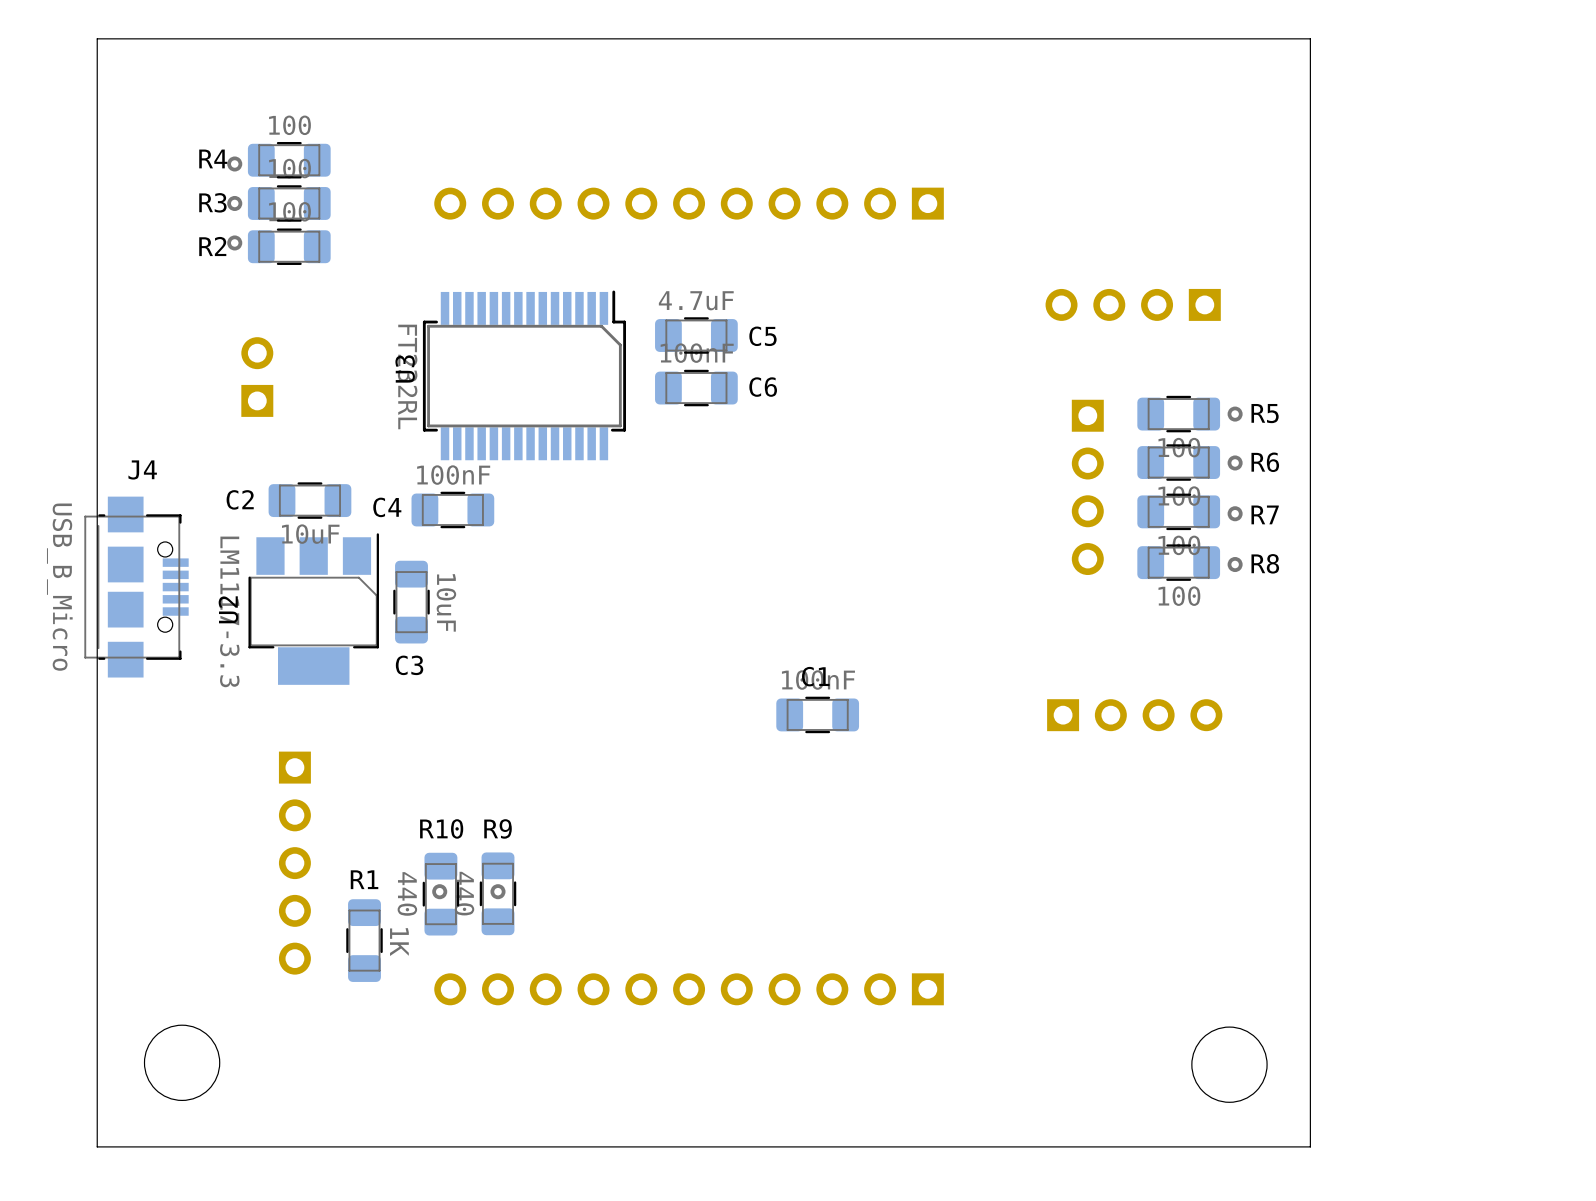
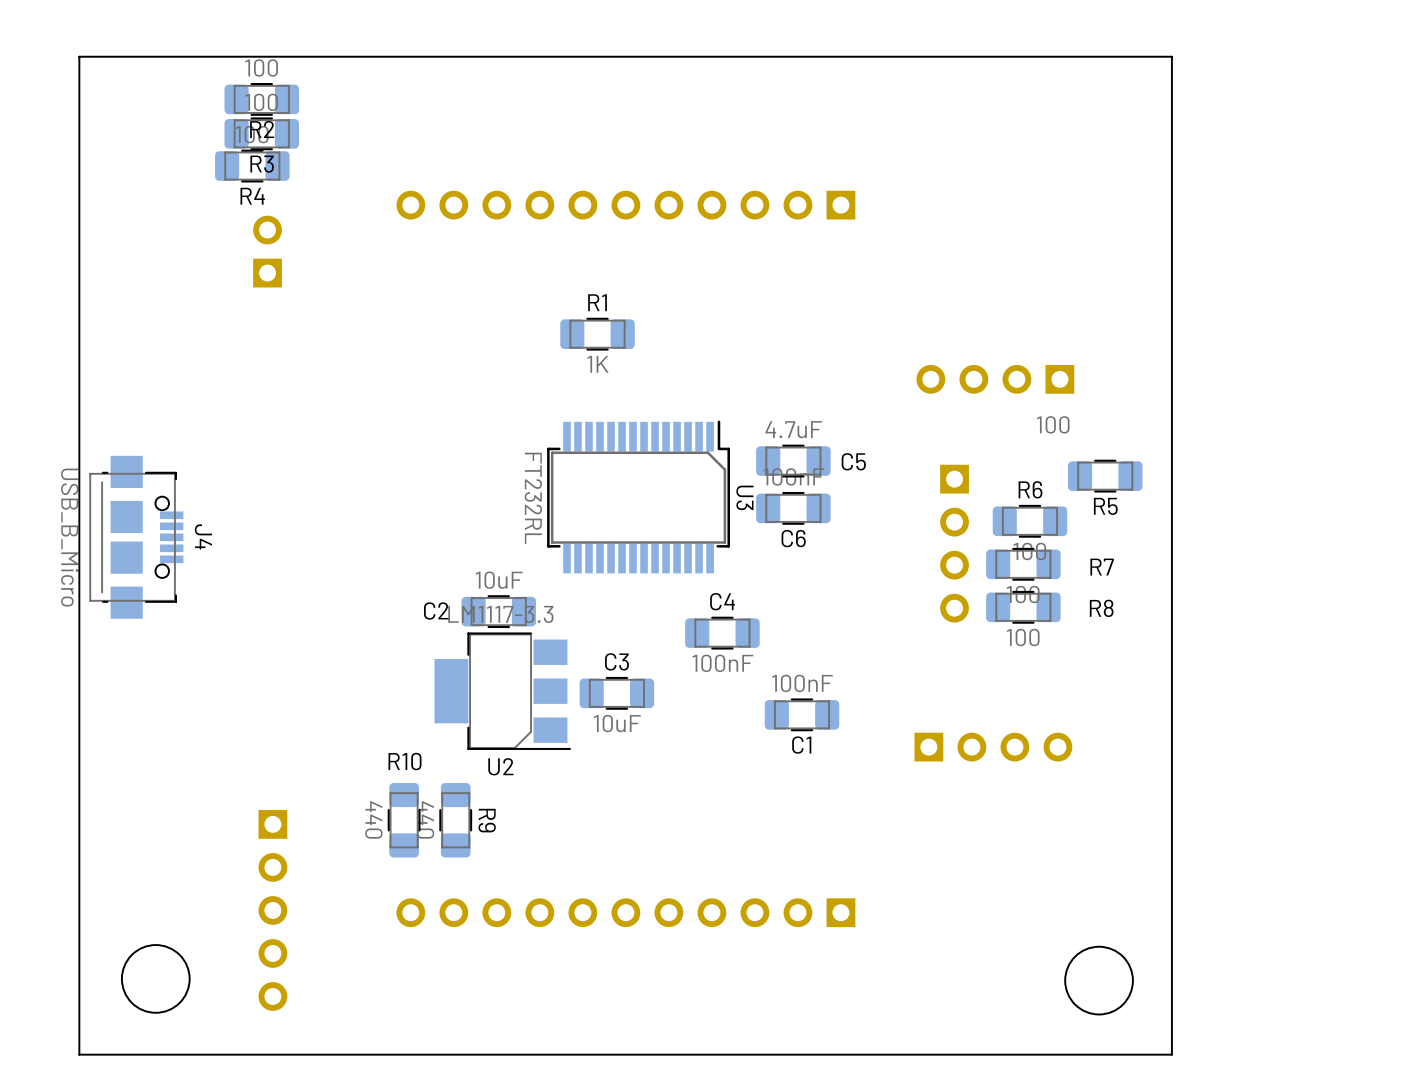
R4 name position: R4 (213, 158) -> R4 (252, 196)
via: (234, 163) -> none
R3 name position: R3 (212, 202) -> R3 (262, 164)
via: (234, 203) -> none
R3 position: (289, 203) -> (261, 133)
part position: (689, 203) -> (625, 205)
via: (234, 242) -> none
R2 name position: R2 (212, 246) -> R2 (262, 129)
R2 position: (289, 246) -> (261, 99)
part: (1133, 304) -> none
C5 position: (696, 335) -> (793, 461)
U3 name rotation: 0° (405, 368) -> 180° (744, 497)
U3 name position: U3 (405, 368) -> U3 (744, 497)
U3 position: (524, 375) -> (638, 496)
part position: (257, 377) -> (267, 251)
C6 name position: C6 (763, 387) -> C6 (793, 538)
C6 position: (696, 388) -> (793, 508)
part: none -> (995, 379)
R5 name position: R5 (1265, 413) -> R5 (1105, 506)
R5 position: (1178, 414) -> (1105, 476)
via: (1235, 414) -> none
R6 position: (1178, 462) -> (1029, 521)
via: (1235, 462) -> none
R6 name position: R6 (1265, 462) -> R6 (1030, 489)
J4 name rotation: 0° (142, 469) -> 90° clockwise (203, 536)
J4 name position: J4 (142, 469) -> J4 (203, 536)
C4 value position: 100nF (453, 475) -> 100nF (722, 663)
part: (1087, 487) -> none
C2 position: (309, 500) -> (498, 611)
C4 name position: C4 (387, 507) -> C4 (722, 601)
C4 position: (452, 509) -> (722, 633)
R7 position: (1178, 511) -> (1023, 564)
via: (1235, 513) -> none
C2 value position: 10uF (310, 534) -> 10uF (499, 580)
R8 position: (1178, 562) -> (1023, 607)
via: (1235, 564) -> none
part: none -> (954, 543)
J4 position: (136, 587) -> (136, 537)
C3 rotation: 0° (411, 602) -> 90° clockwise (616, 693)
C3 position: (411, 602) -> (616, 693)
U2 name position: U2 (228, 609) -> U2 (500, 766)
U2 rotation: 0° (313, 609) -> 90° clockwise (502, 691)
U2 position: (313, 609) -> (502, 691)
C3 name position: C3 (409, 665) -> C3 (616, 661)
C1 name position: C1 (815, 676) -> C1 (801, 745)
C1 position: (817, 714) -> (801, 714)
part: (1134, 715) -> none
part: none -> (993, 747)
R9 name rotation: 0° (498, 828) -> 90° clockwise (487, 820)
R9 name position: R9 (498, 828) -> R9 (487, 820)
part position: (294, 863) -> (272, 910)
via: (439, 891) -> none
via: (498, 891) -> none
R9 position: (498, 893) -> (455, 820)
R10 position: (440, 894) -> (404, 820)
R1 rotation: 0° (364, 940) -> 90° clockwise (597, 334)
R1 position: (364, 940) -> (597, 334)
part position: (689, 989) -> (625, 912)

